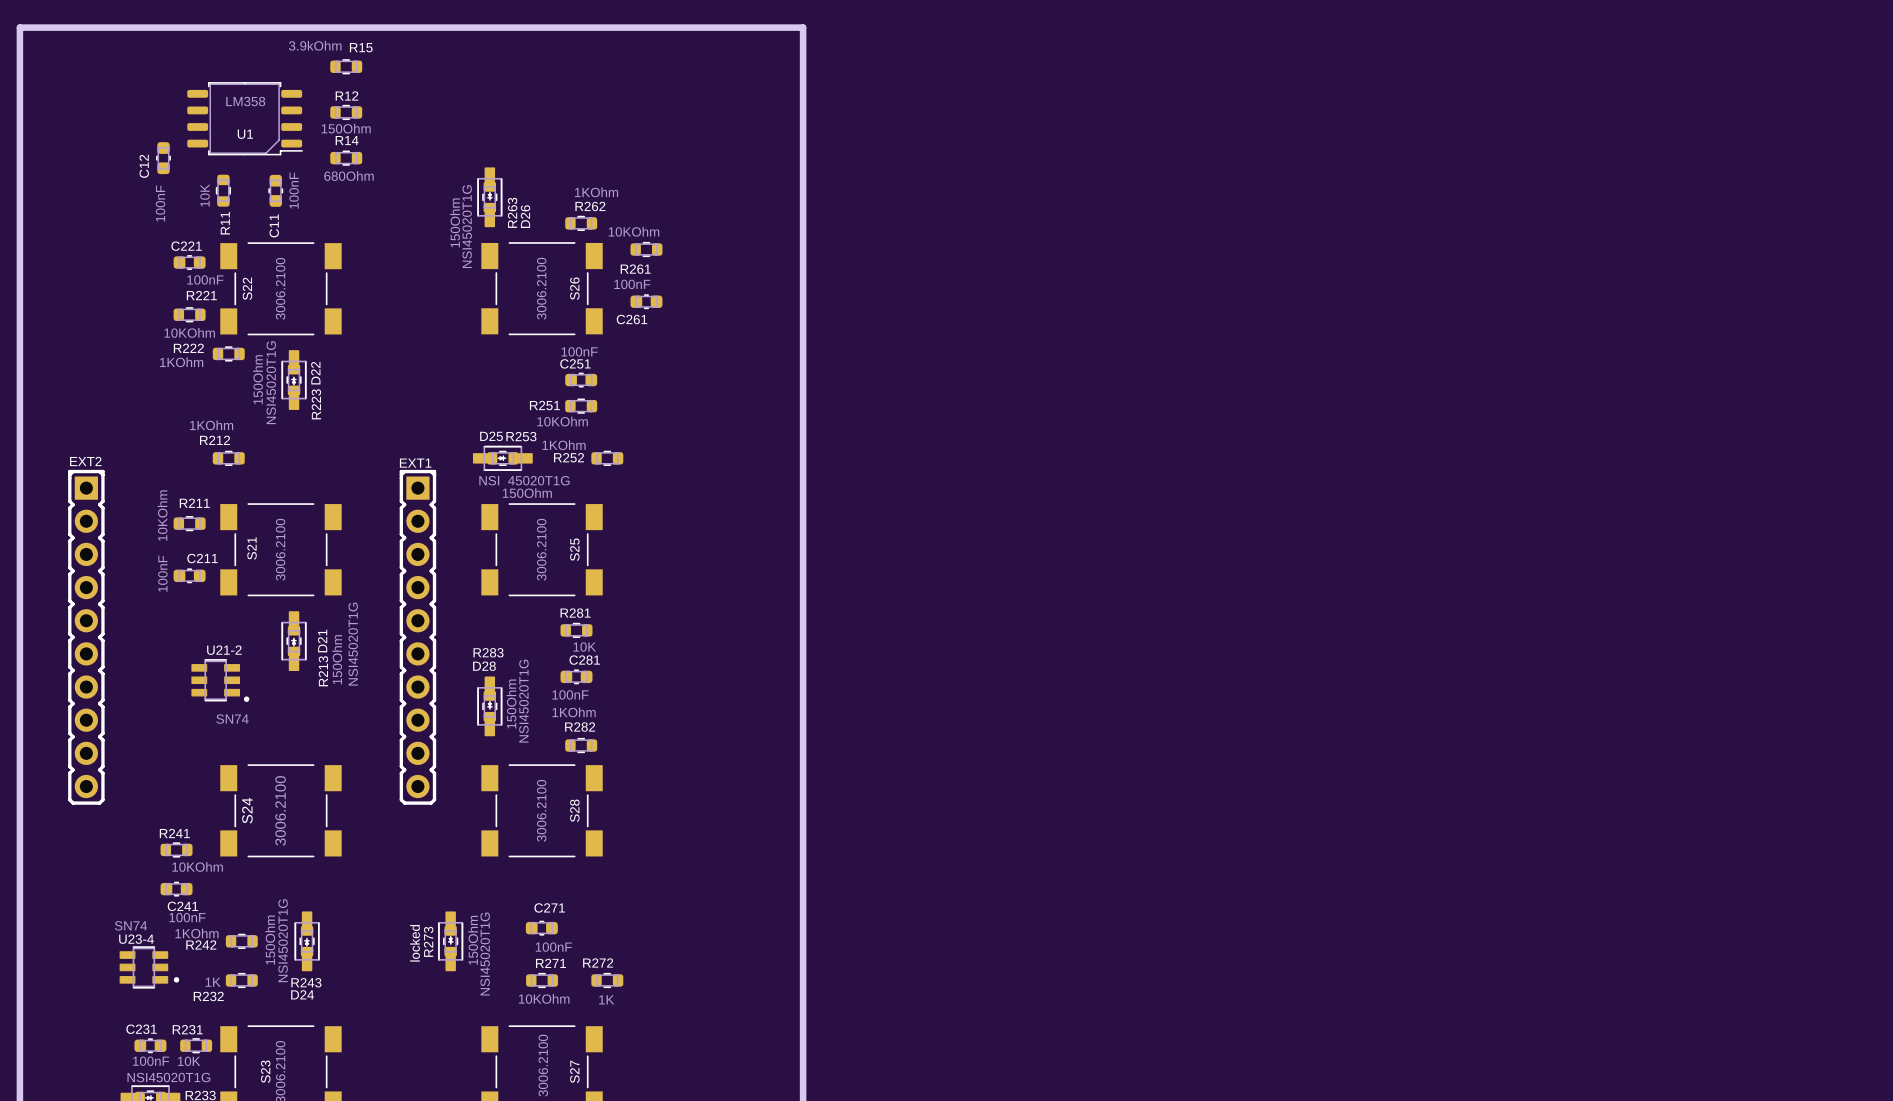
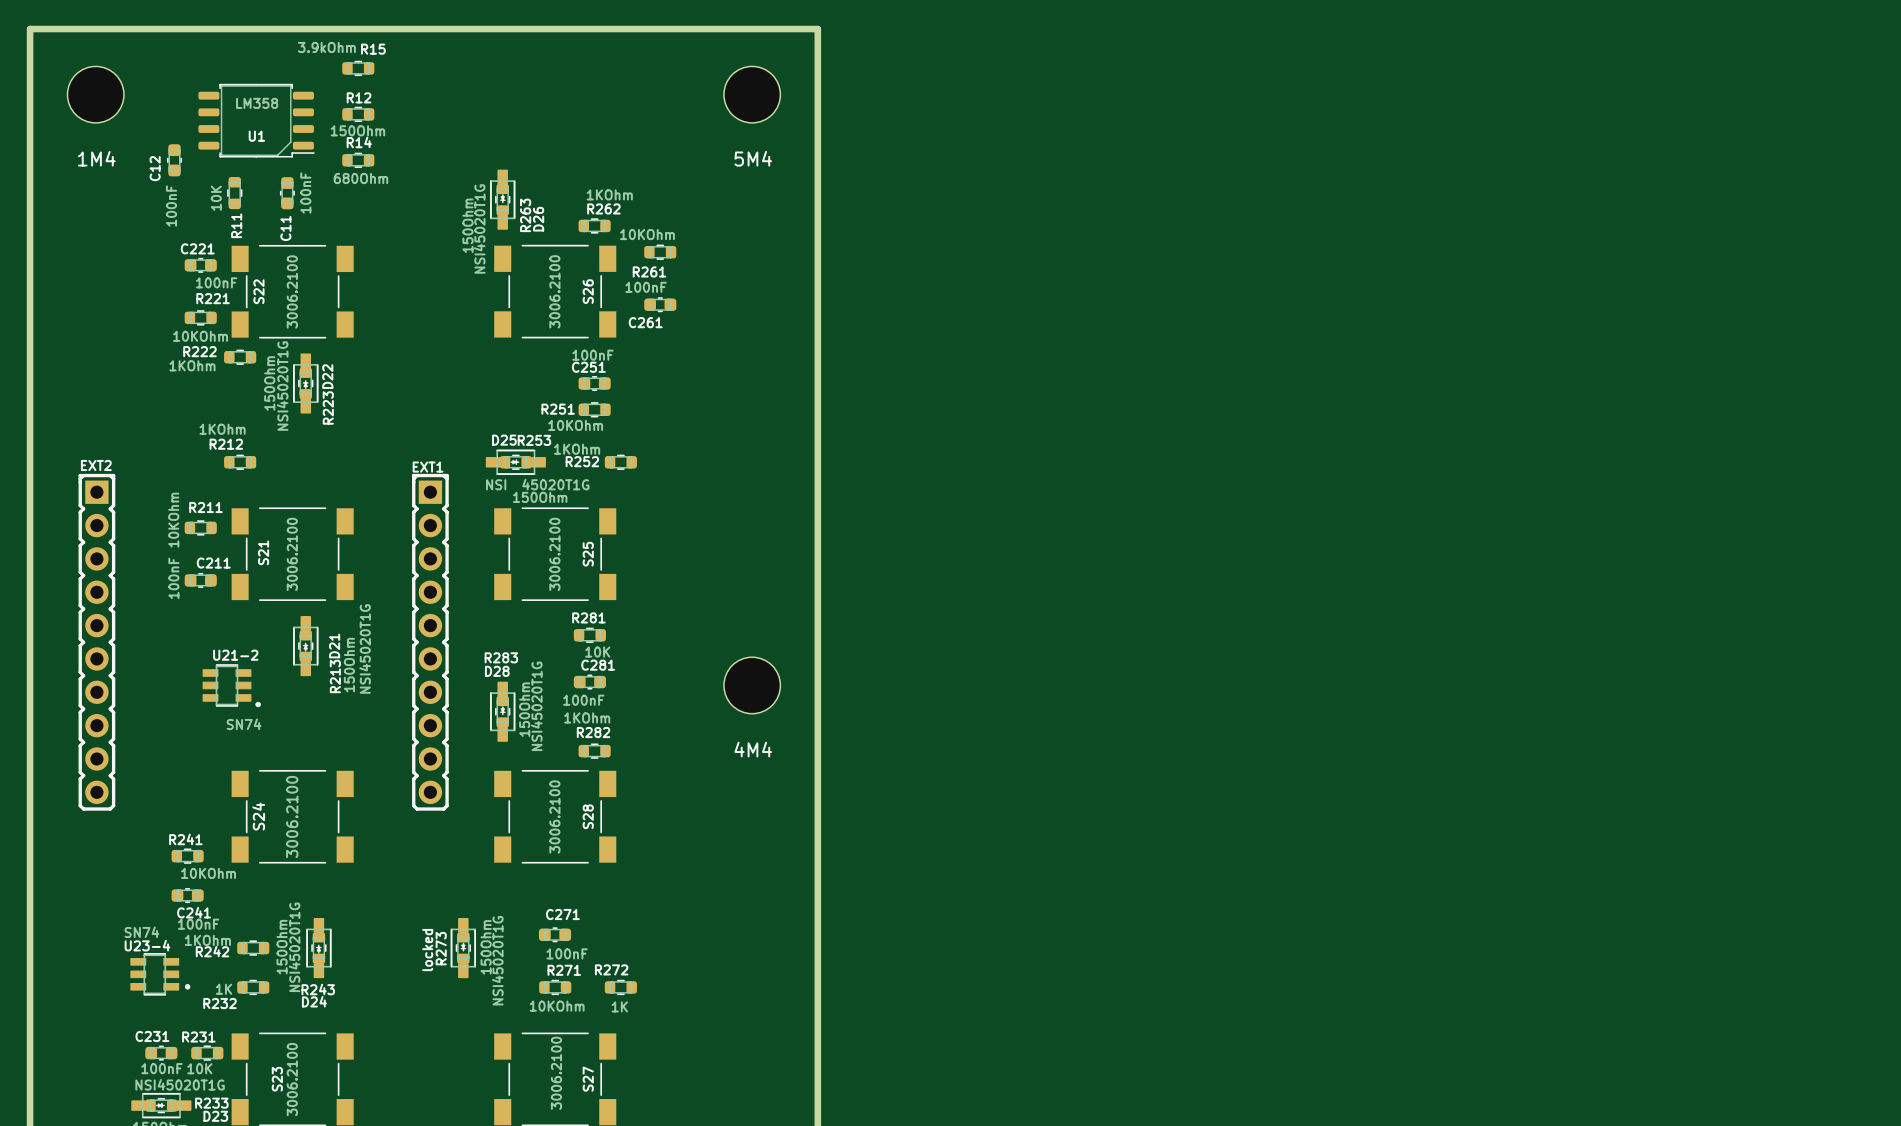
1M4: none -> (95, 94)
5M4: none -> (752, 94)
4M4: none -> (752, 685)

